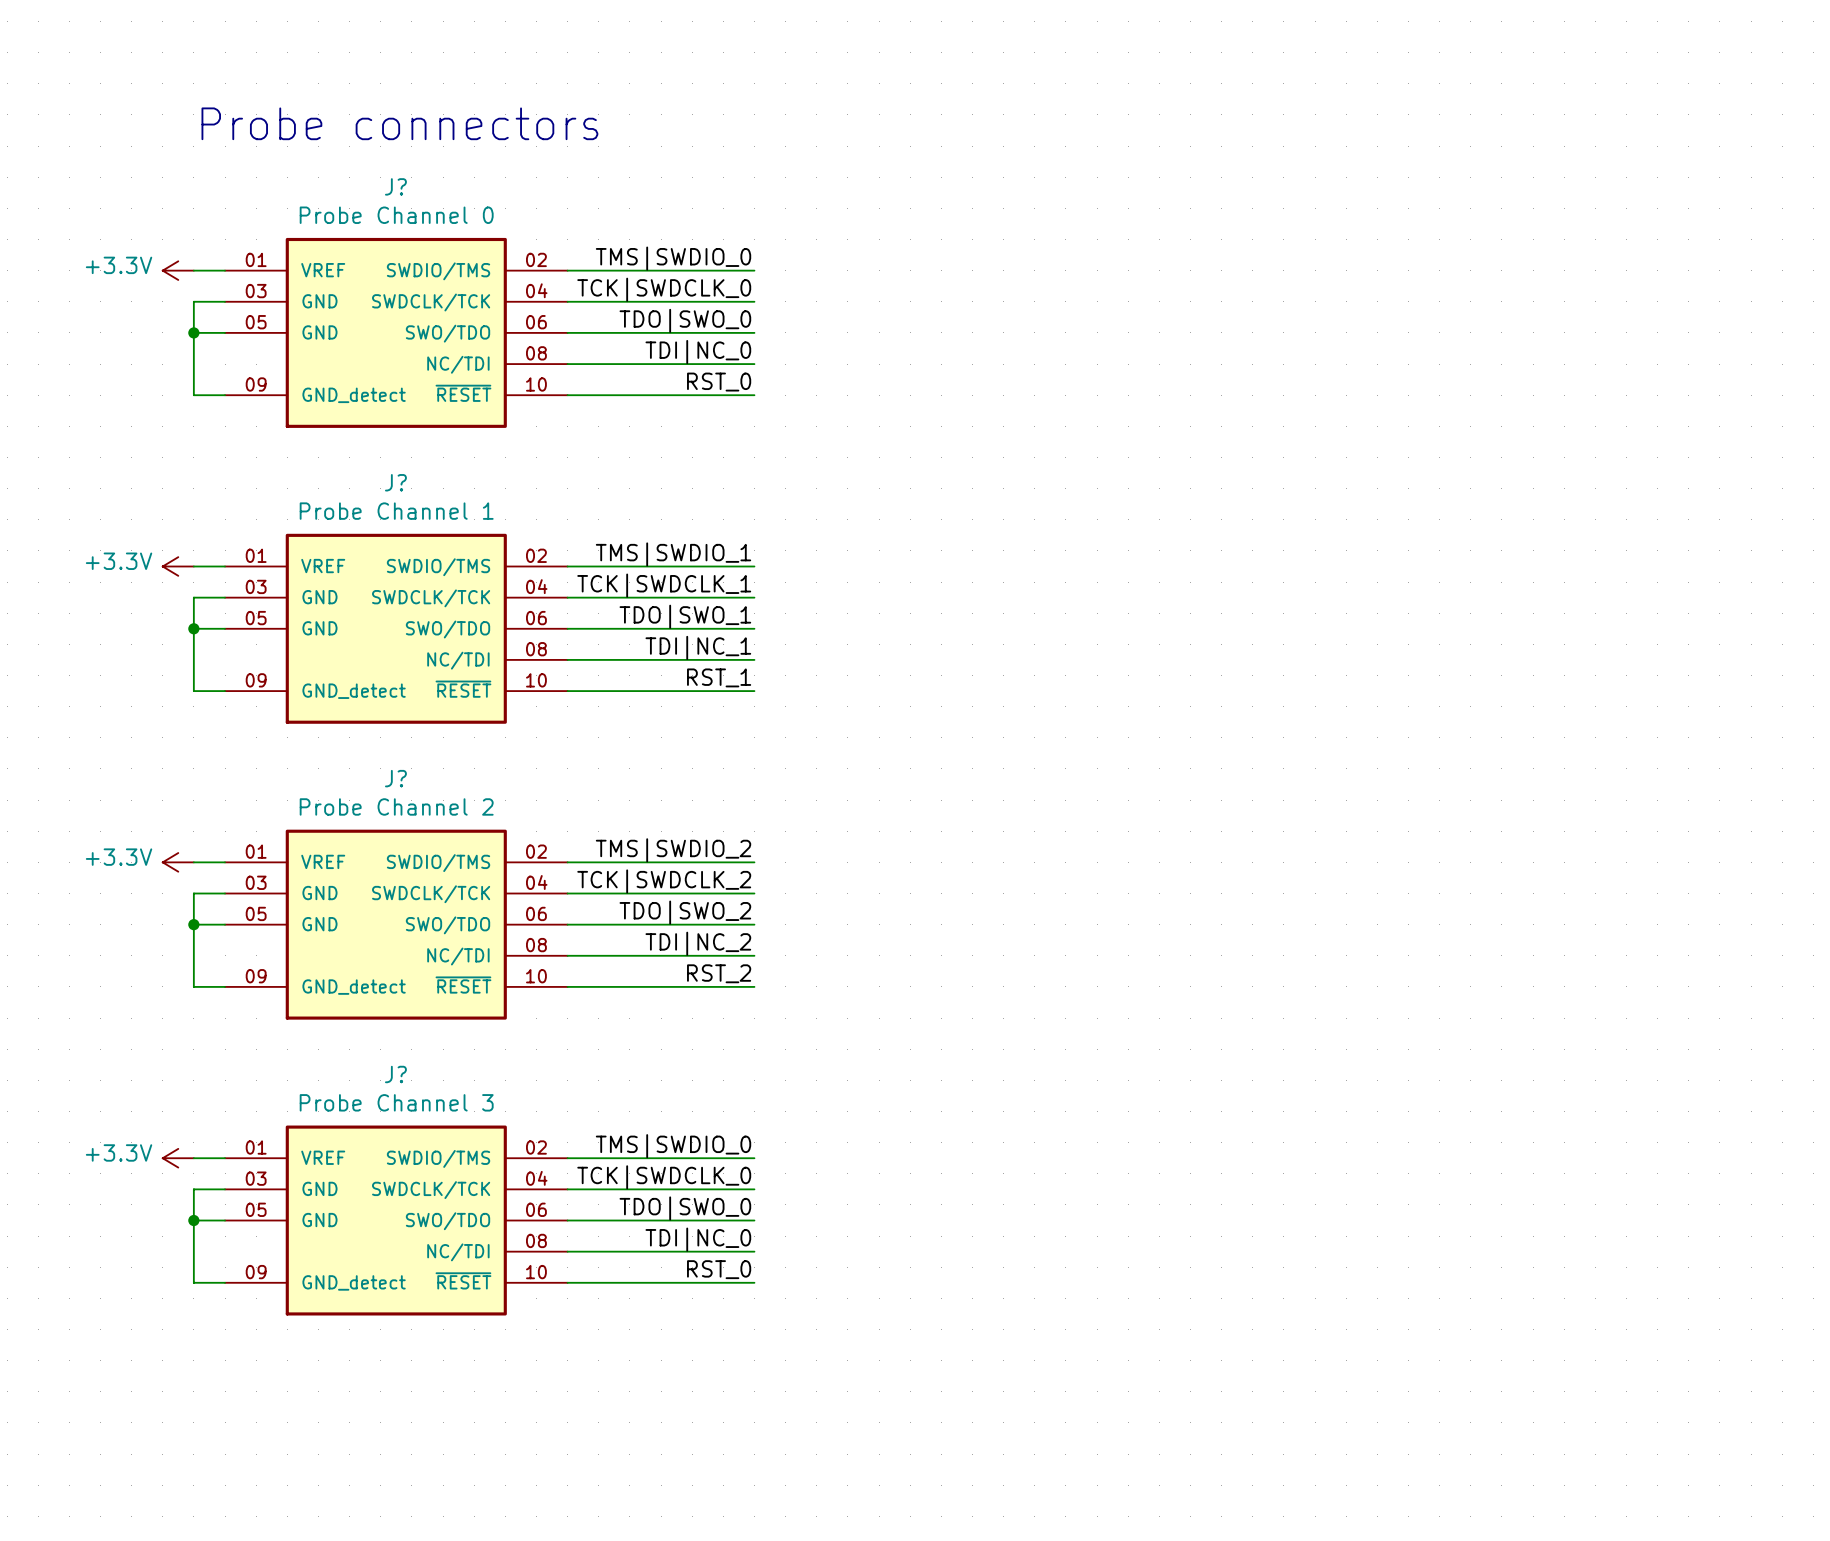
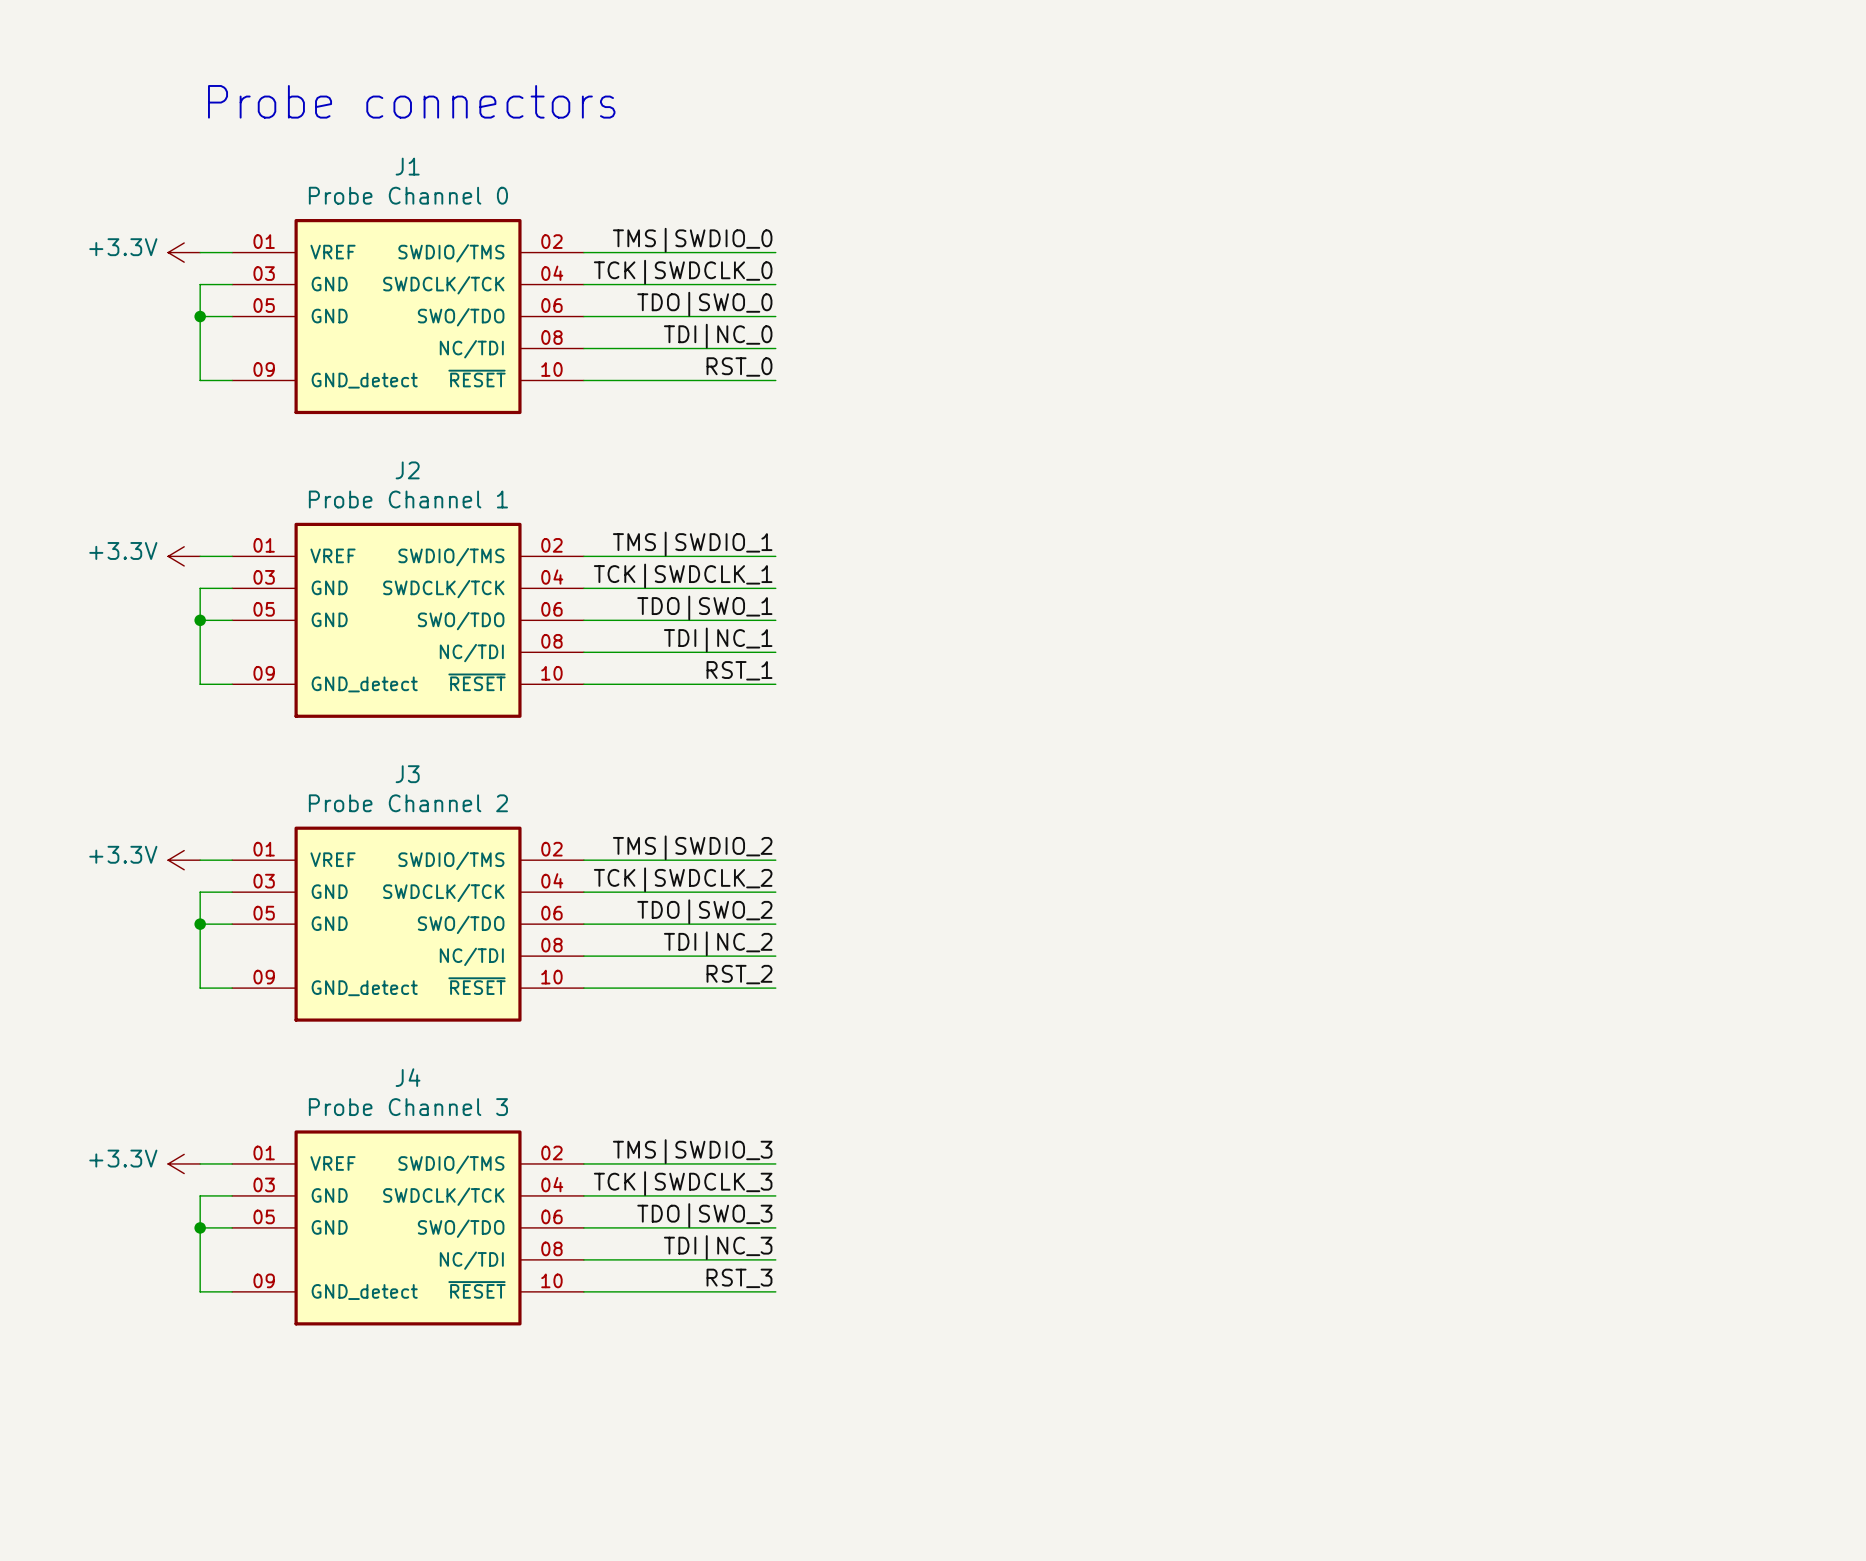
J? name: J? (395, 186) -> J1 (407, 166)
J? name: J? (395, 482) -> J2 (407, 470)
J? name: J? (395, 778) -> J3 (407, 774)
J? name: J? (395, 1074) -> J4 (408, 1077)
label: TMS|SWDIO_0 (673, 1146) -> TMS|SWDIO_3 (692, 1151)
label: TCK|SWDCLK_0 (664, 1177) -> TCK|SWDCLK_3 (683, 1183)
label: TDO|SWO_0 (685, 1208) -> TDO|SWO_3 (704, 1215)
label: TDI|NC_0 (698, 1239) -> TDI|NC_3 (718, 1247)
label: RST_0 (719, 1269) -> RST_3 (739, 1278)

